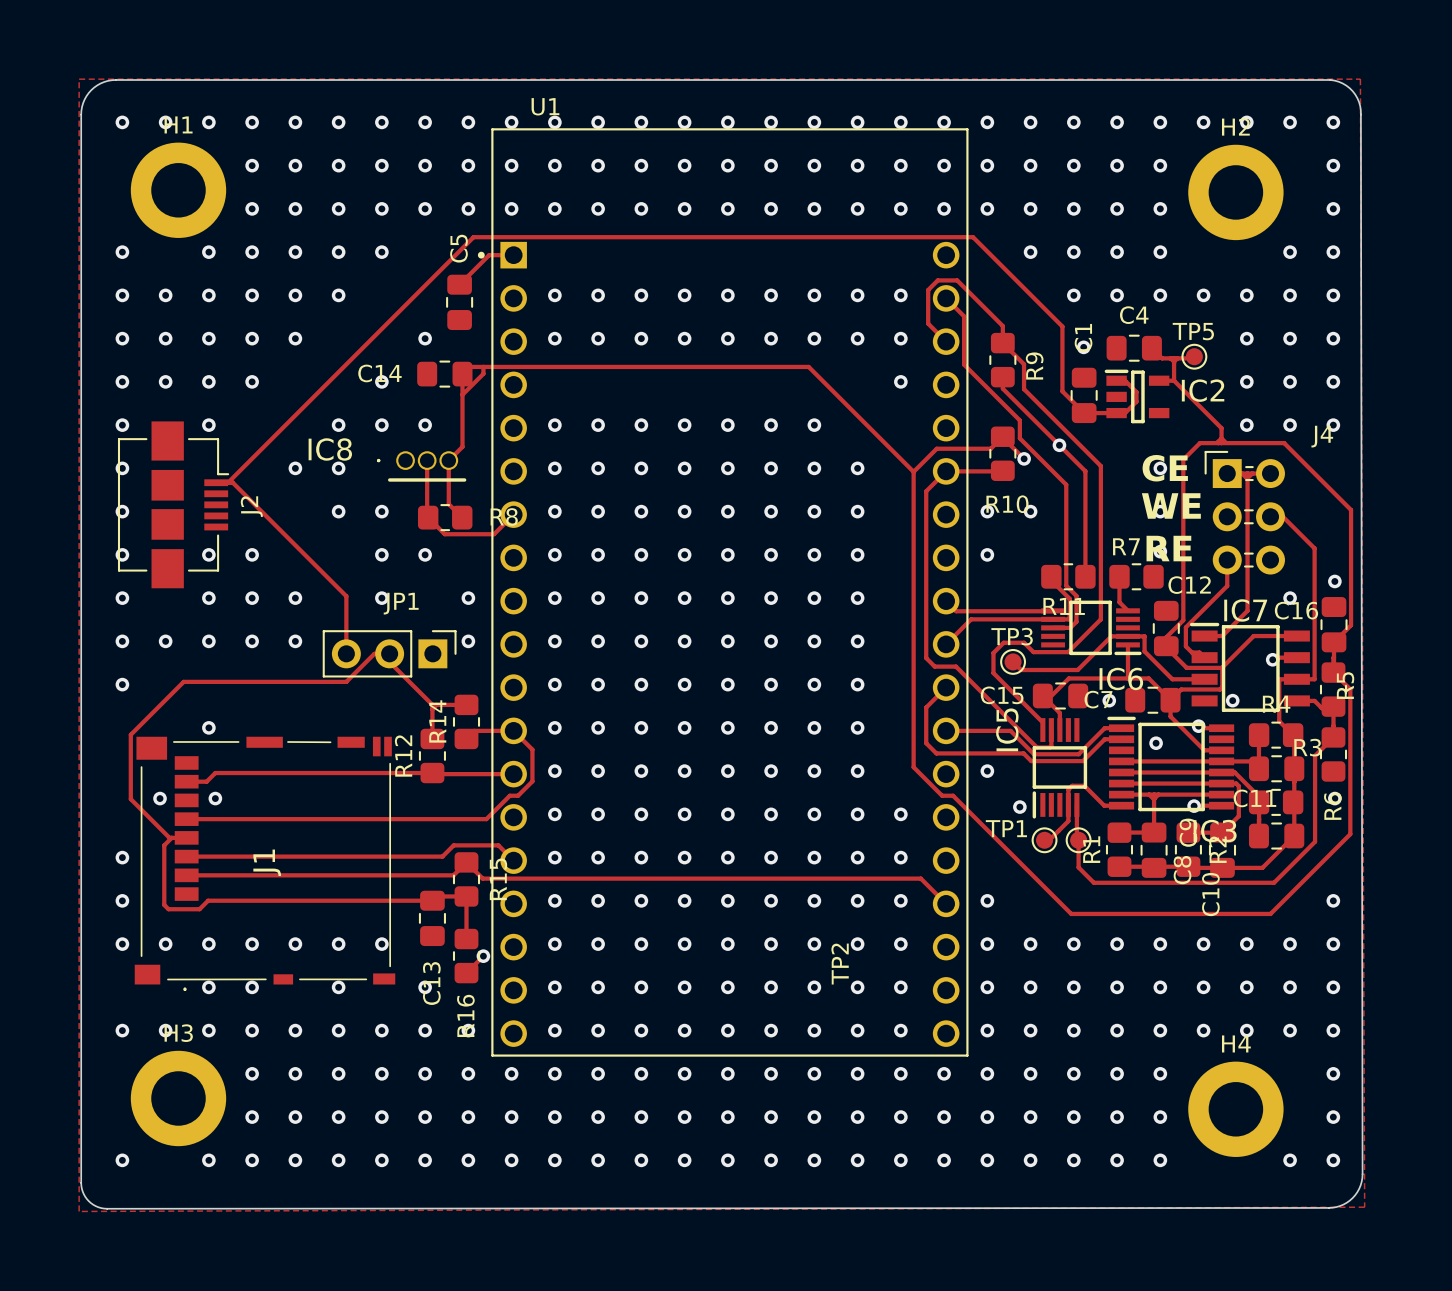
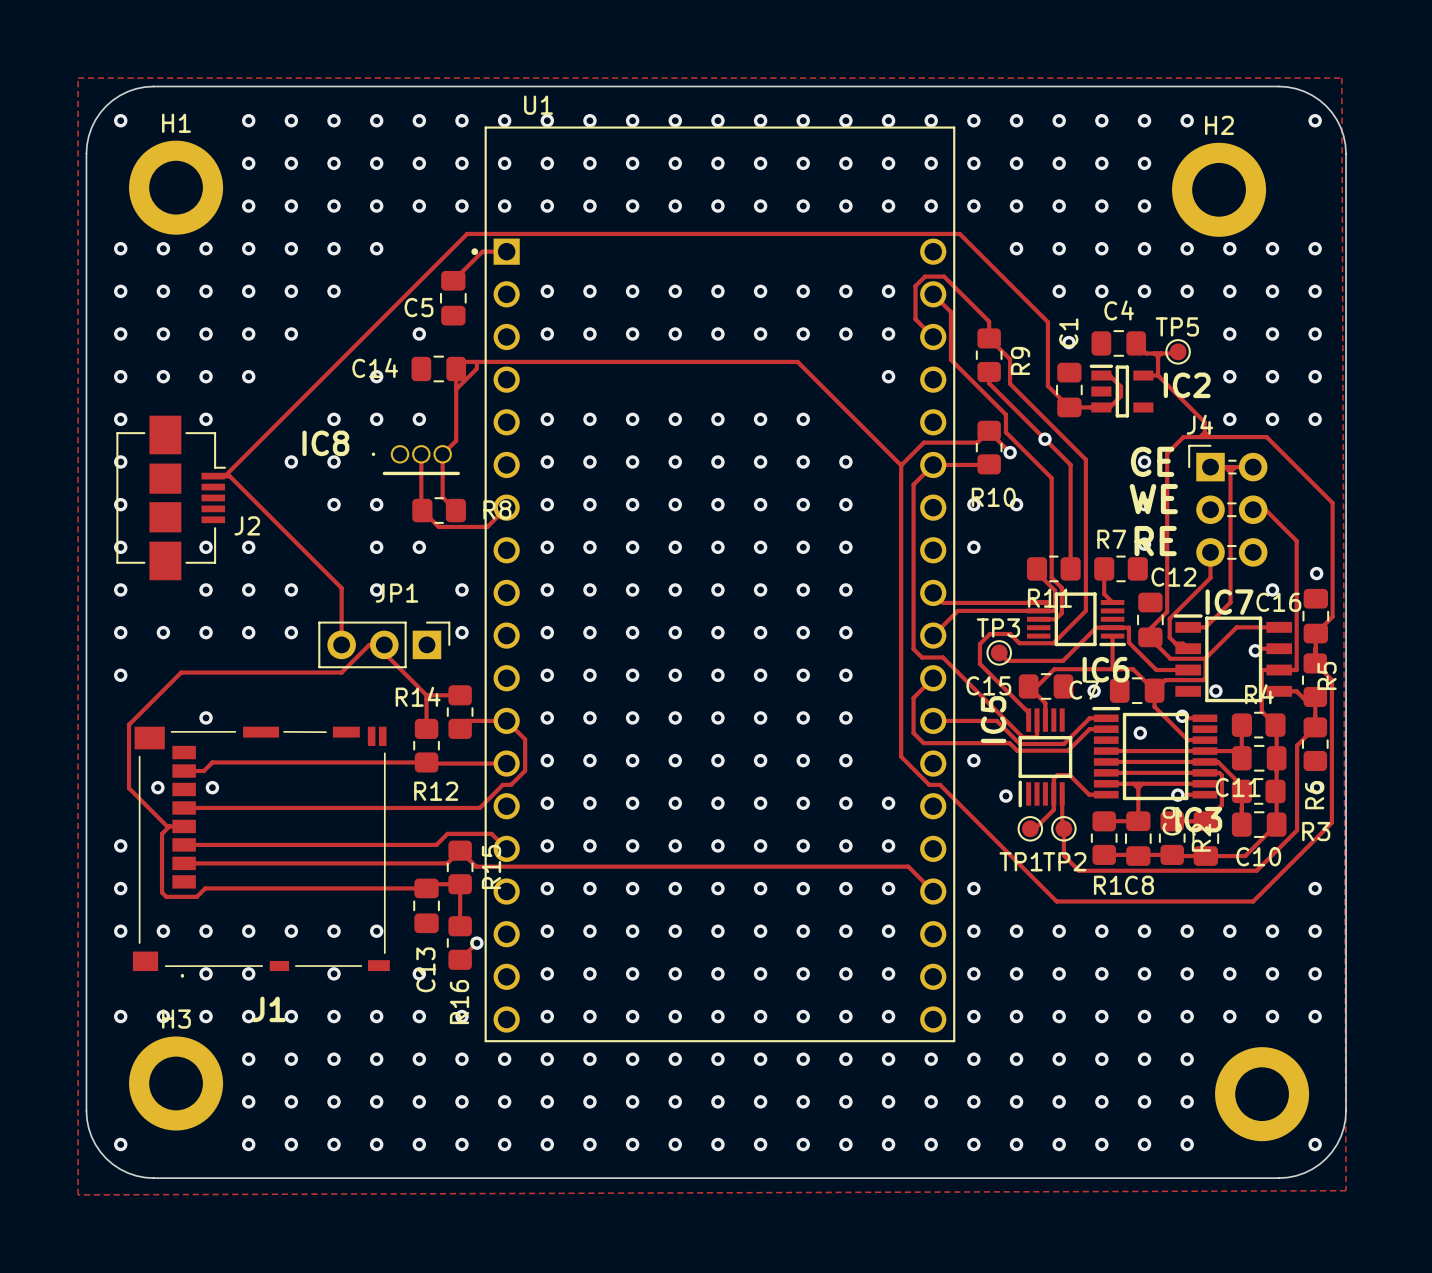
board edge: (115, 80) (1330, 80) (1342, 83) (1349, 88) (1359, 102) (1360, 114) (1362, 1174) (1360, 1185) (1352, 1198) (1343, 1204) (1328, 1207) (107, 1208) (95, 1206) (88, 1201) (83, 1194) (81, 1182) (81, 114) (83, 103) (91, 90) (104, 81) (115, 80) -> (153, 86) (127, 91) (106, 106) (91, 127) (86, 153) (86, 1110) (91, 1136) (106, 1158) (127, 1173) (153, 1178) (1278, 1178) (1304, 1173) (1326, 1158) (1340, 1136) (1346, 1110) (1346, 153) (1340, 127) (1326, 106) (1304, 91) (1278, 86) (153, 86)
via: (165, 122) -> none
via: (208, 122) -> none
via: (1246, 122) -> none
via: (1290, 122) -> none
via: (1333, 165) -> none
via: (1333, 208) -> none
C5 name rotation: 0° (458, 248) -> 90° clockwise (418, 307)
C5 name position: C5 (458, 248) -> C5 (418, 307)
via: none -> (163, 248)
via: none -> (1187, 248)
via: none -> (1229, 248)
J4 name position: J4 (1322, 436) -> J4 (1199, 424)
J2 name rotation: 0° (251, 506) -> 90° clockwise (247, 525)
R14 name rotation: 0° (437, 721) -> 90° clockwise (418, 696)
R3 name position: R3 (1307, 747) -> R3 (1316, 831)
R12 name rotation: 0° (403, 756) -> 90° clockwise (436, 791)
R12 name position: R12 (403, 756) -> R12 (436, 791)
TP1 name position: TP1 (1006, 828) -> TP1 (1021, 861)
R1 name rotation: 0° (1091, 849) -> 90° clockwise (1107, 885)
R1 name position: R1 (1091, 849) -> R1 (1107, 885)
J1 name rotation: 0° (267, 862) -> 90° clockwise (269, 1009)
J1 name position: J1 (267, 862) -> J1 (269, 1009)
C8 name rotation: 0° (1182, 870) -> 90° clockwise (1139, 885)
C10 name rotation: 0° (1210, 894) -> 90° clockwise (1258, 856)
C10 name position: C10 (1210, 894) -> C10 (1258, 856)
TP2 name rotation: 0° (840, 964) -> 90° clockwise (1064, 861)
TP2 name position: TP2 (840, 964) -> TP2 (1064, 861)
via: none -> (1187, 1059)
via: (1333, 1073) -> none
H4: (1235, 1109) -> none
part: none -> (1262, 1094)
via: none -> (1187, 1101)
via: (1333, 1117) -> none
via: (208, 1160) -> none
via: none -> (1187, 1144)
via: (1290, 1160) -> none

